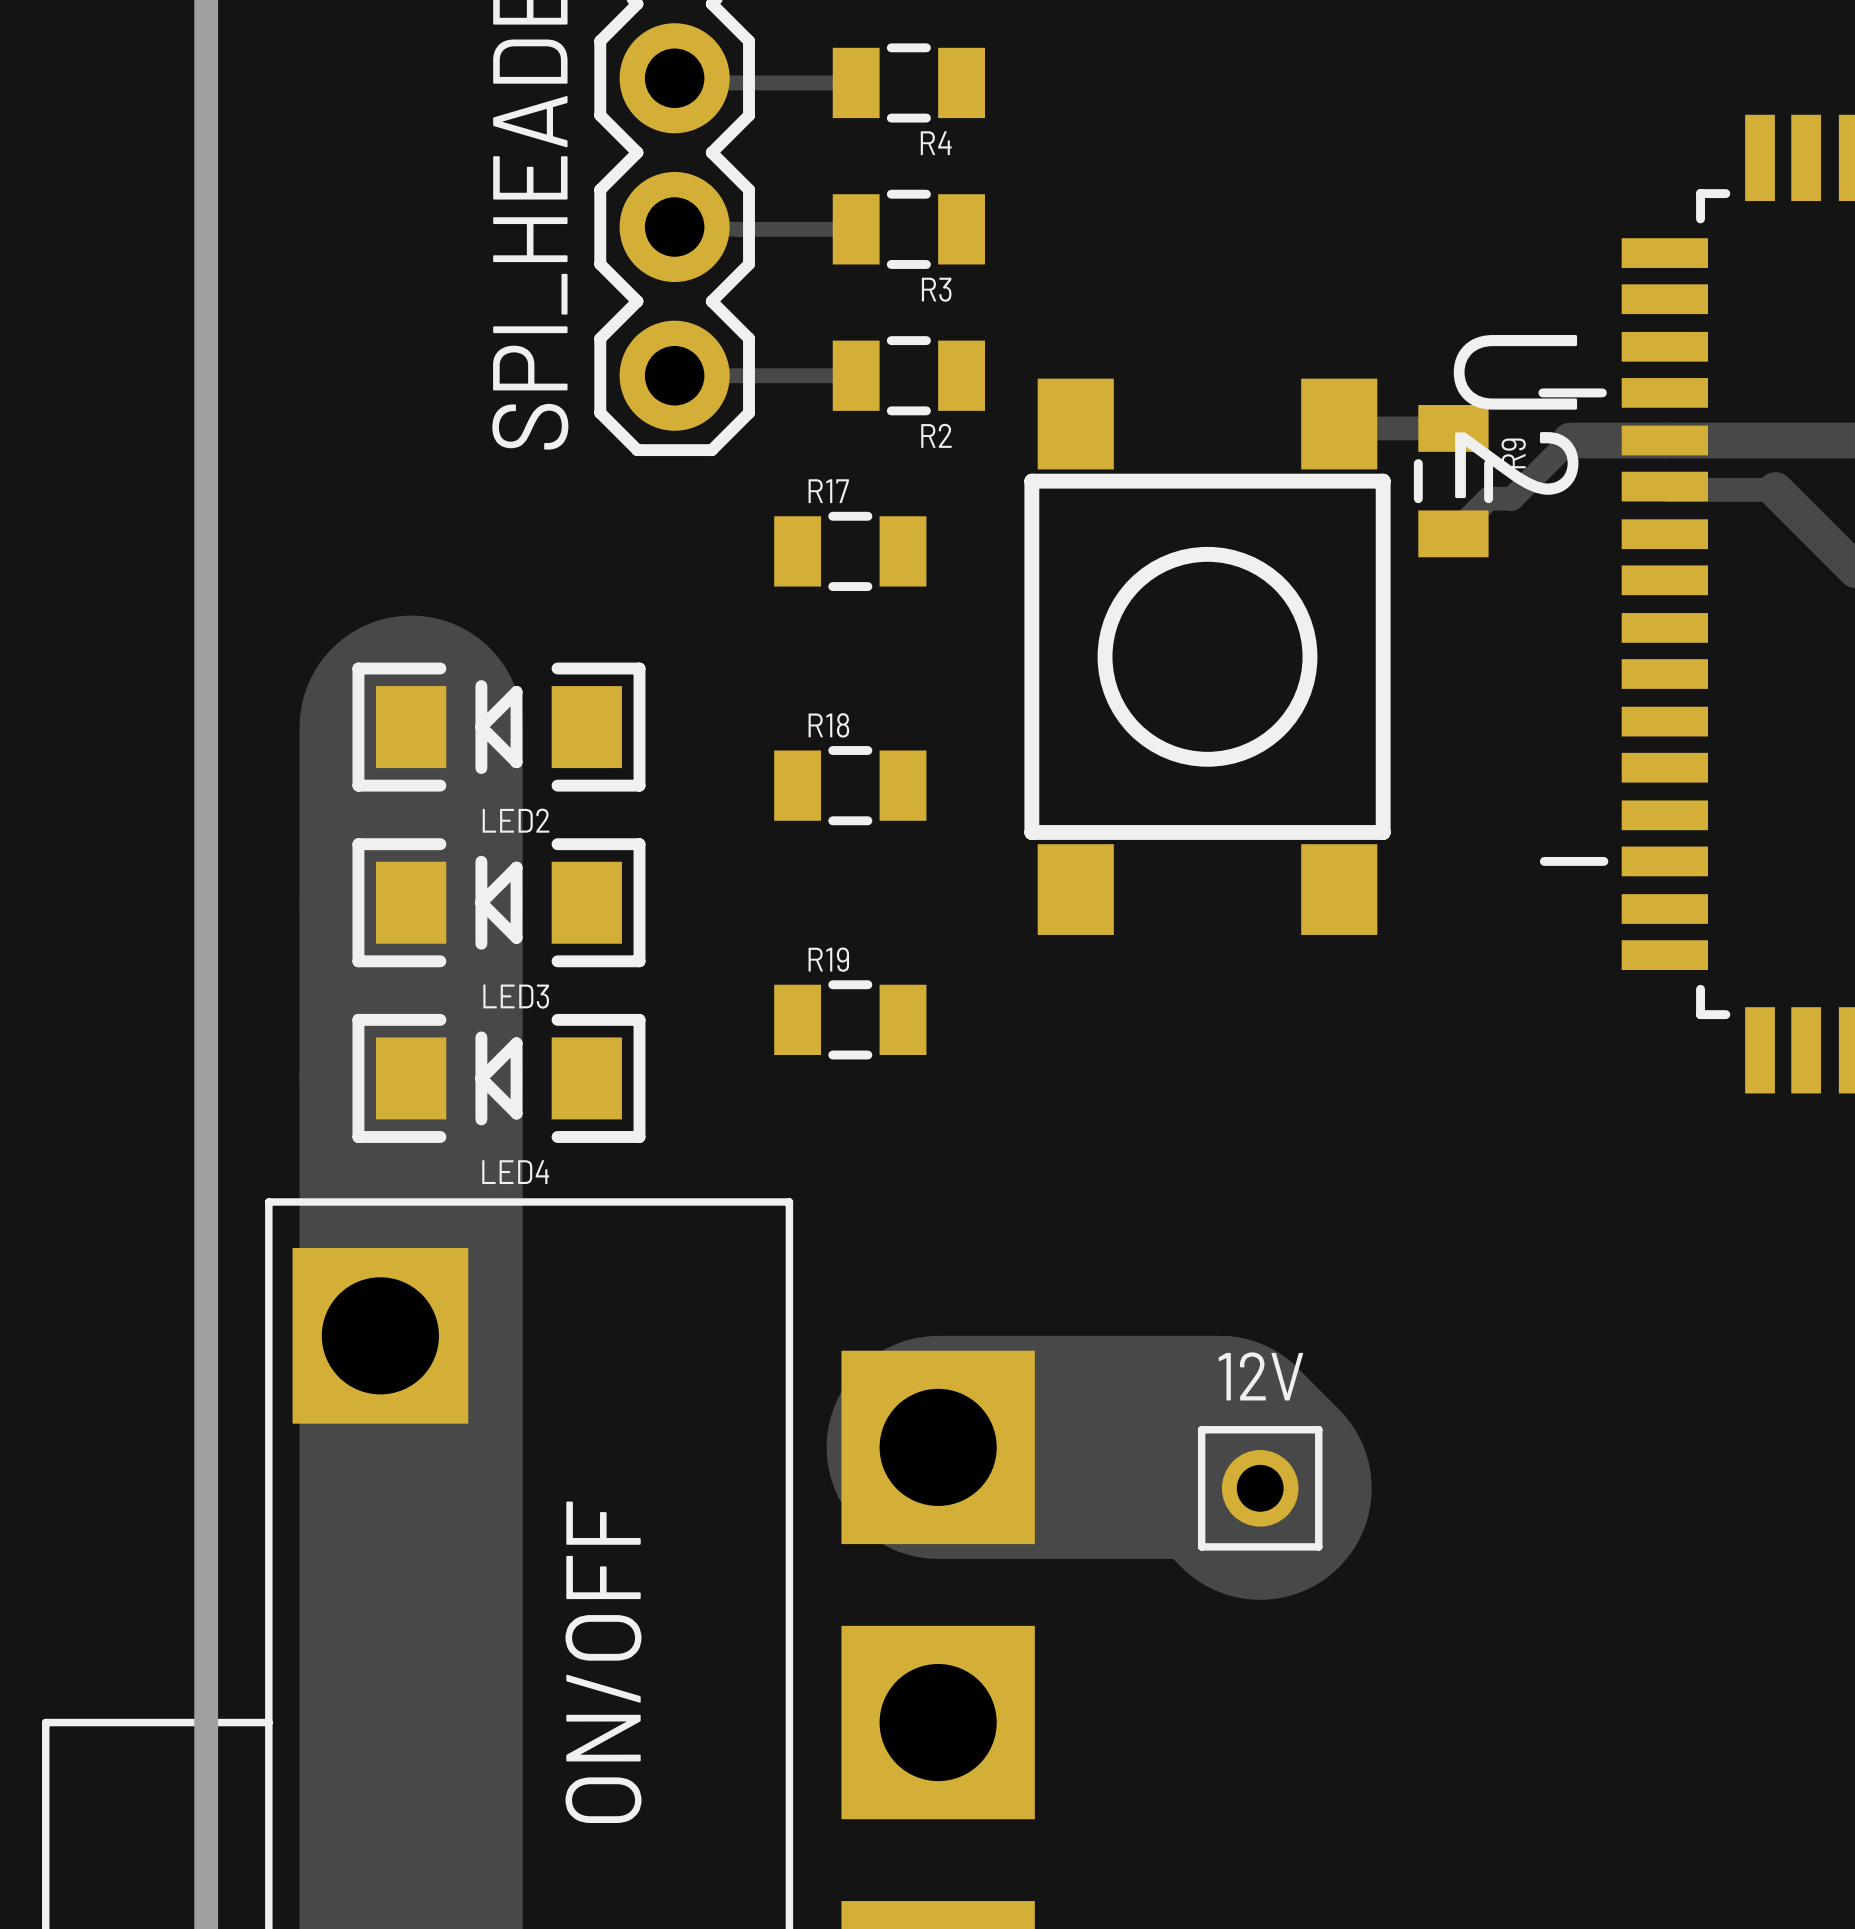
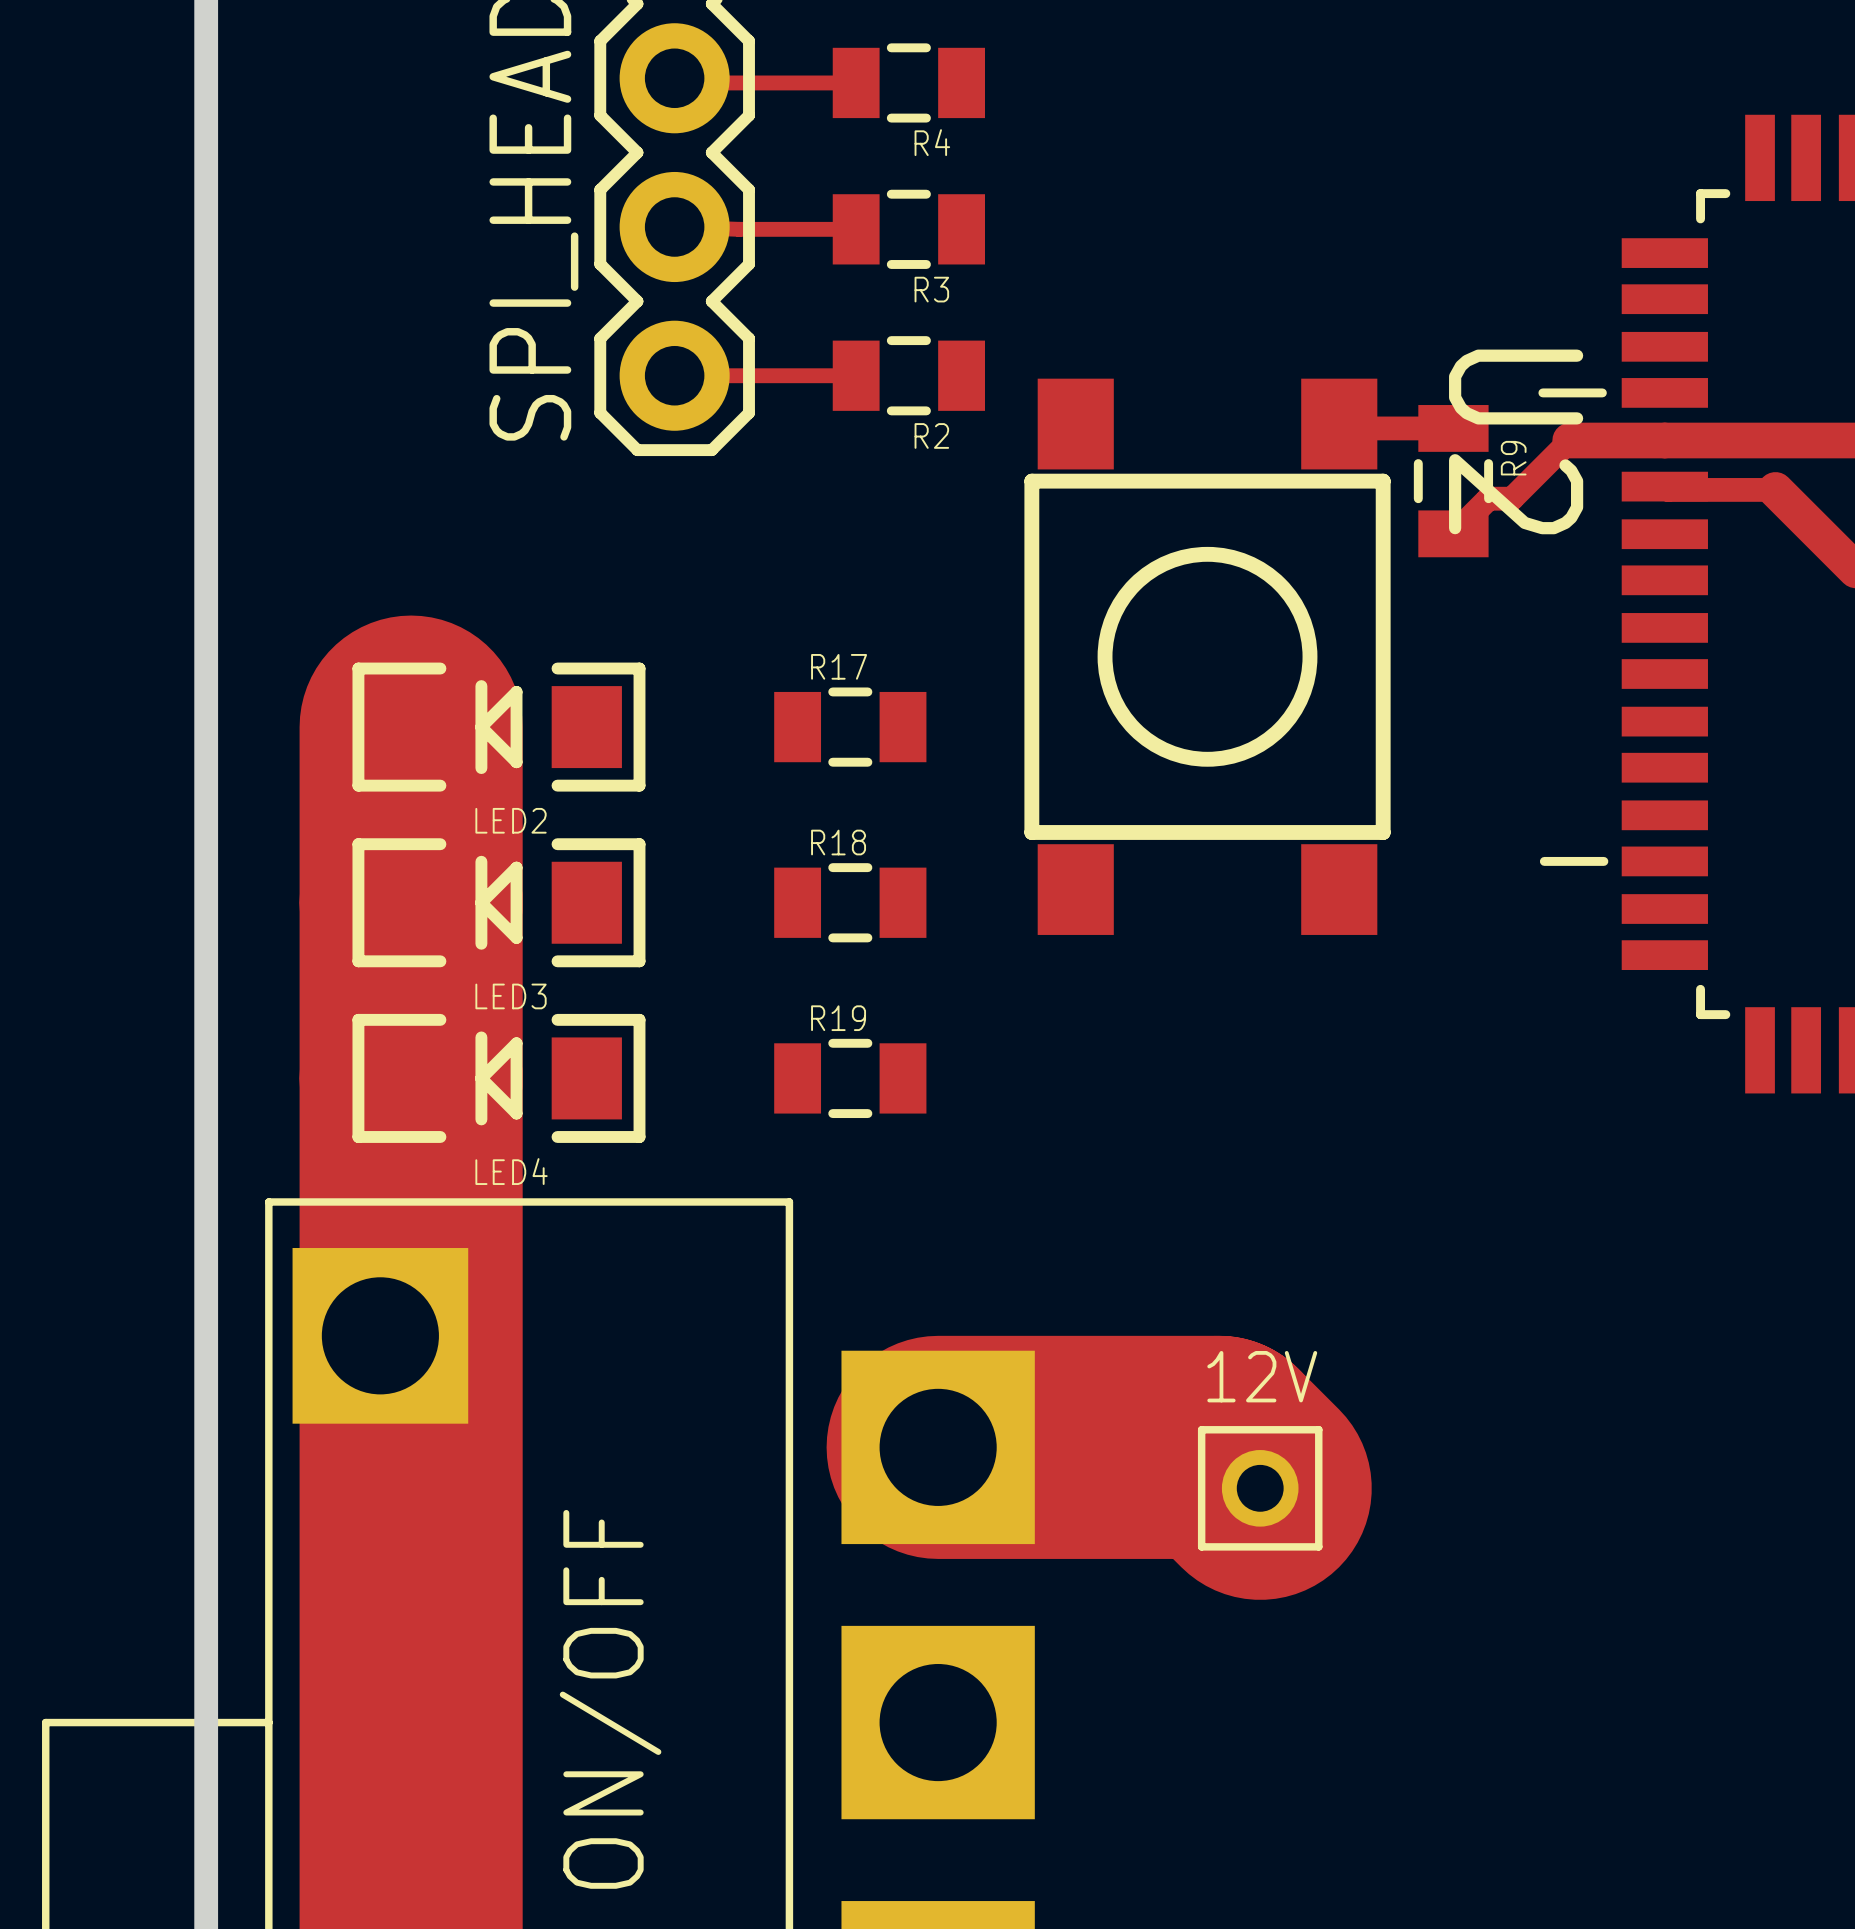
R17 position: (850, 551) -> (850, 727)
R18 position: (850, 785) -> (850, 902)
R19 position: (850, 1019) -> (850, 1078)

